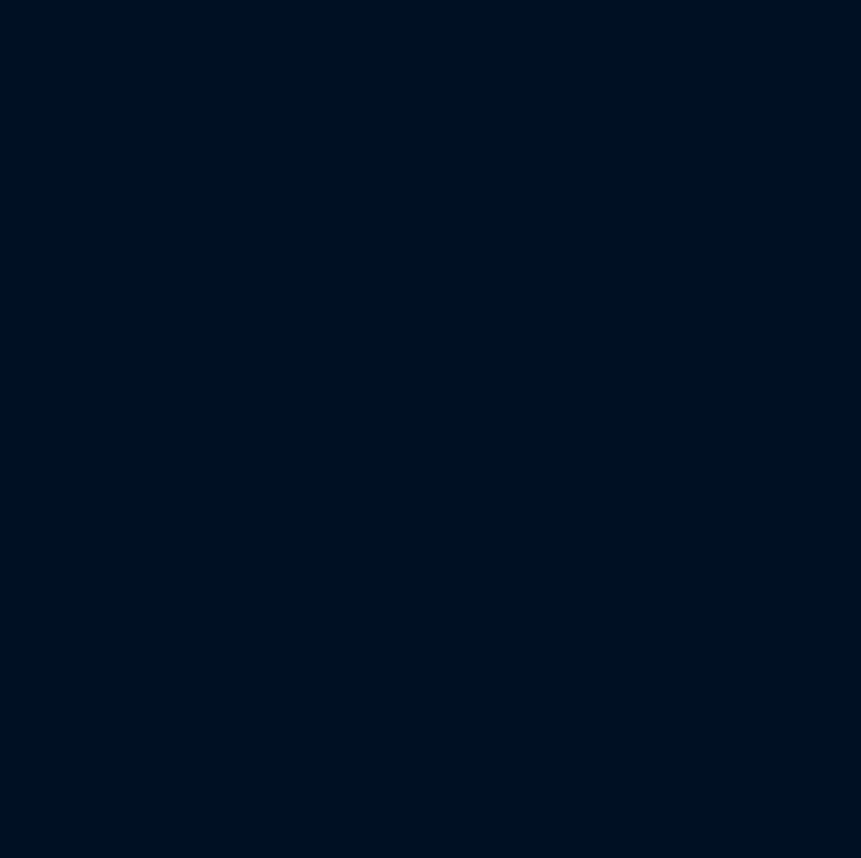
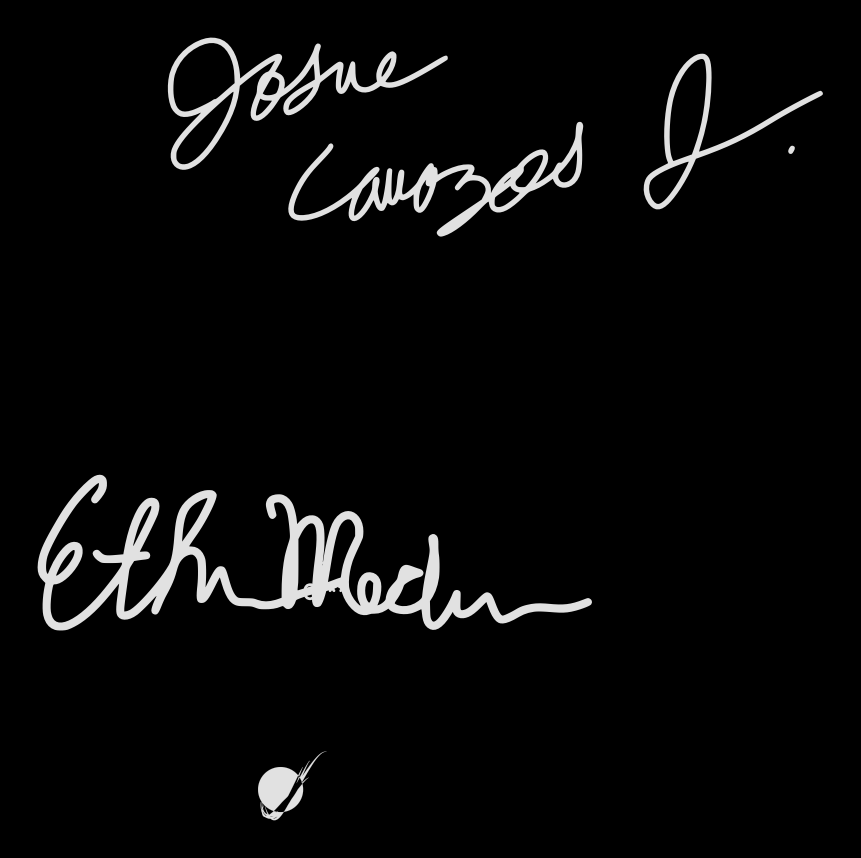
drawing: none -> [167, 37, 823, 237]
part: none -> (314, 552)
drawing: none -> [258, 751, 327, 821]

